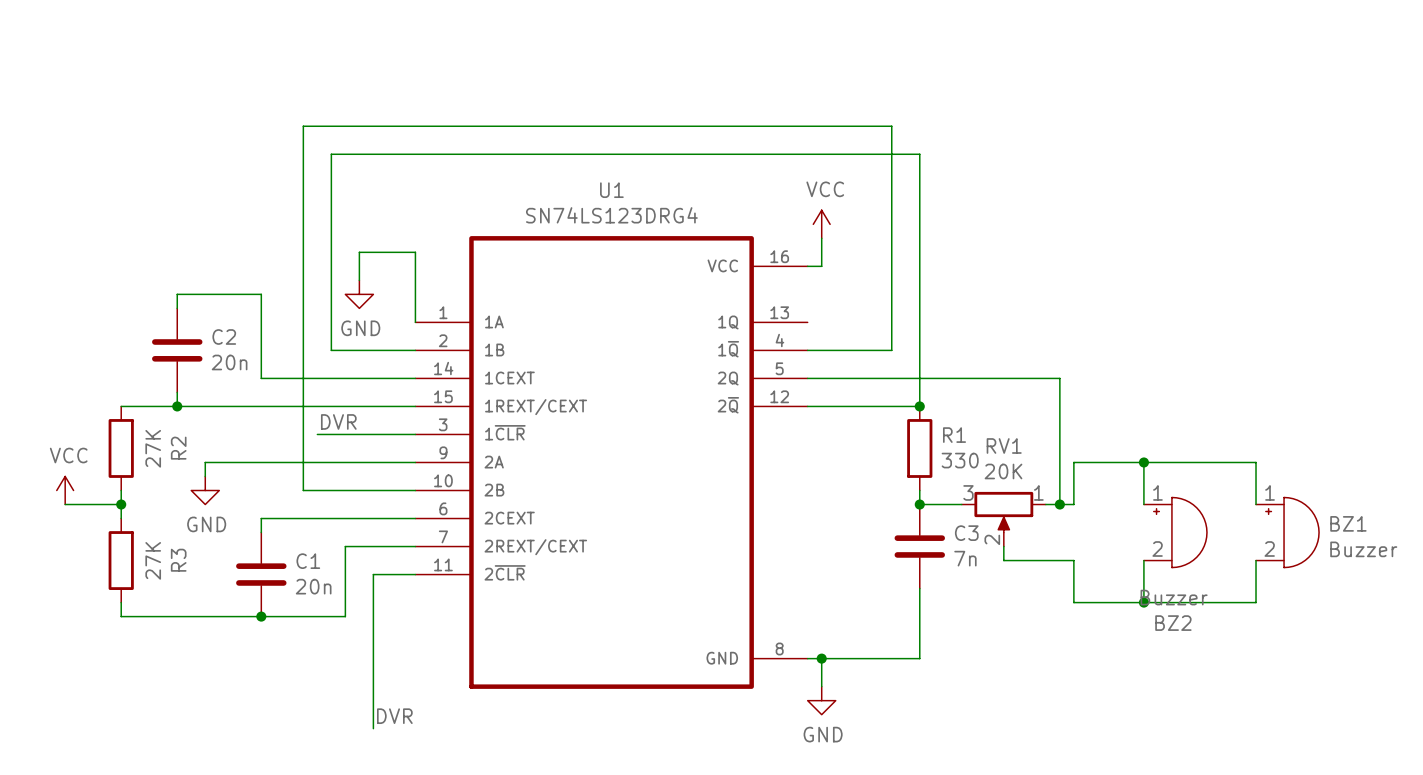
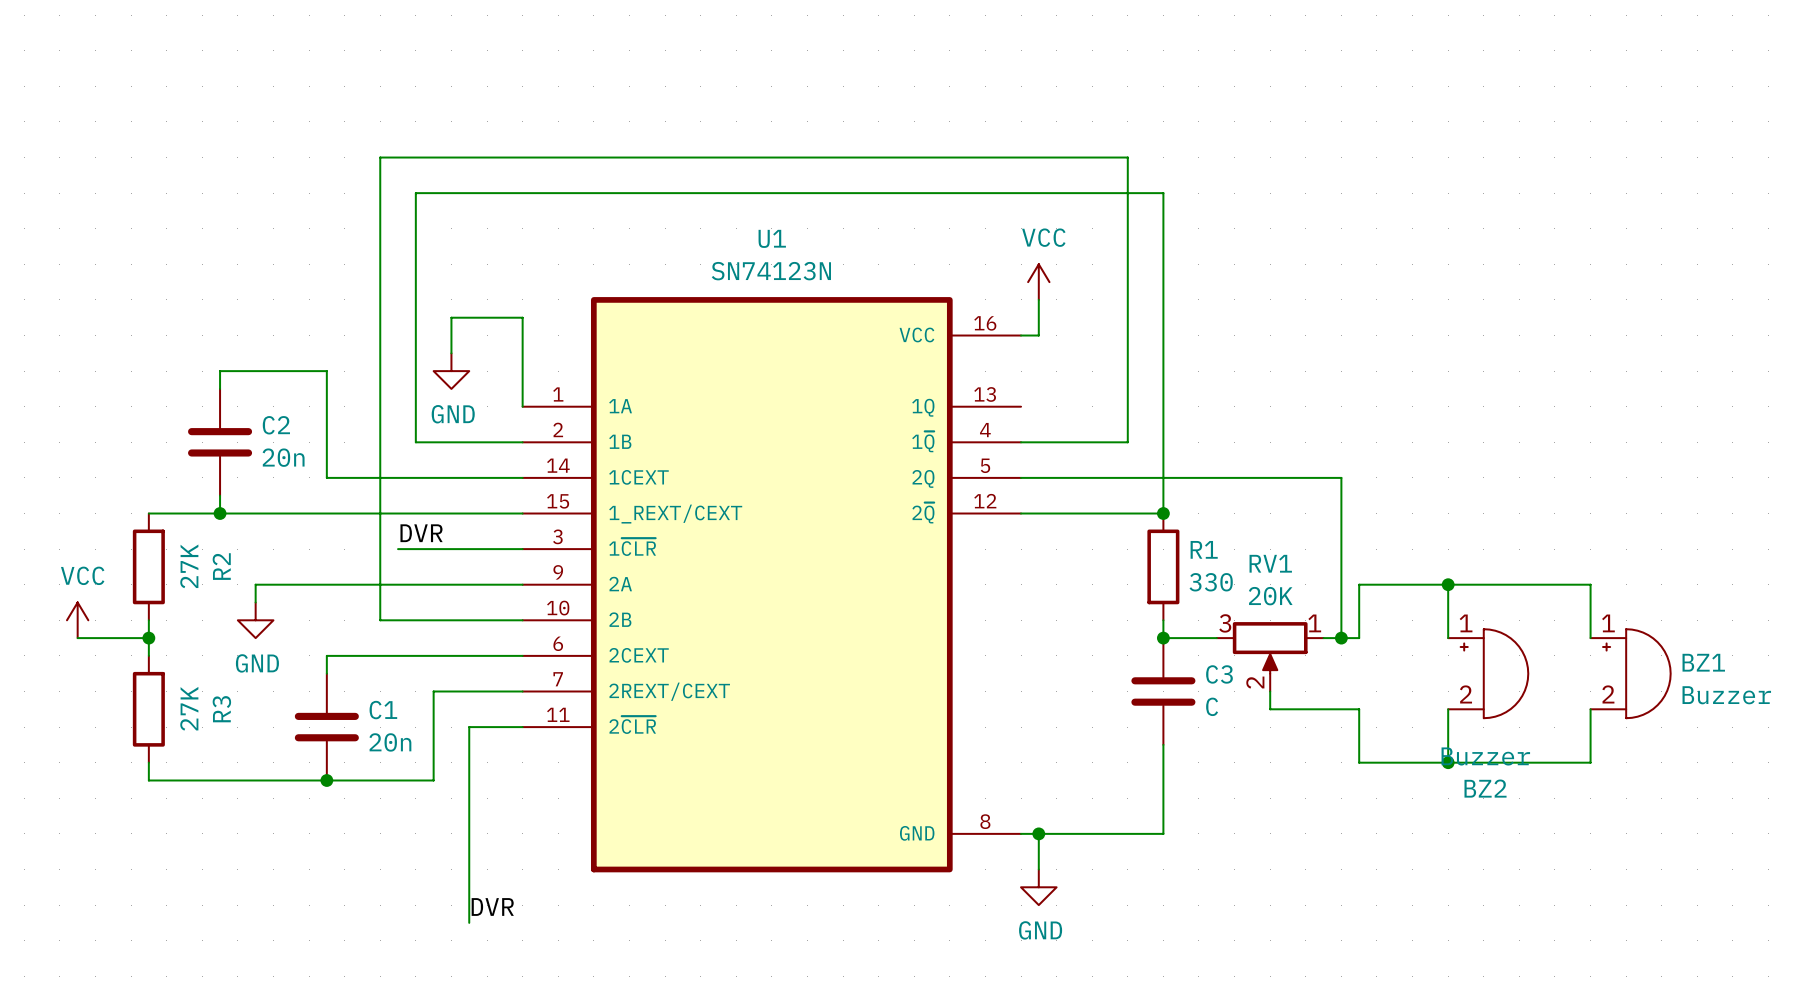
U1 value: SN74LS123DRG4 (611, 215) -> SN74123N (771, 271)
U1 pin name: 1REXT/CEXT (536, 407) -> 1_REXT/CEXT (675, 514)
C3 value: 7n (965, 558) -> C (1212, 706)

